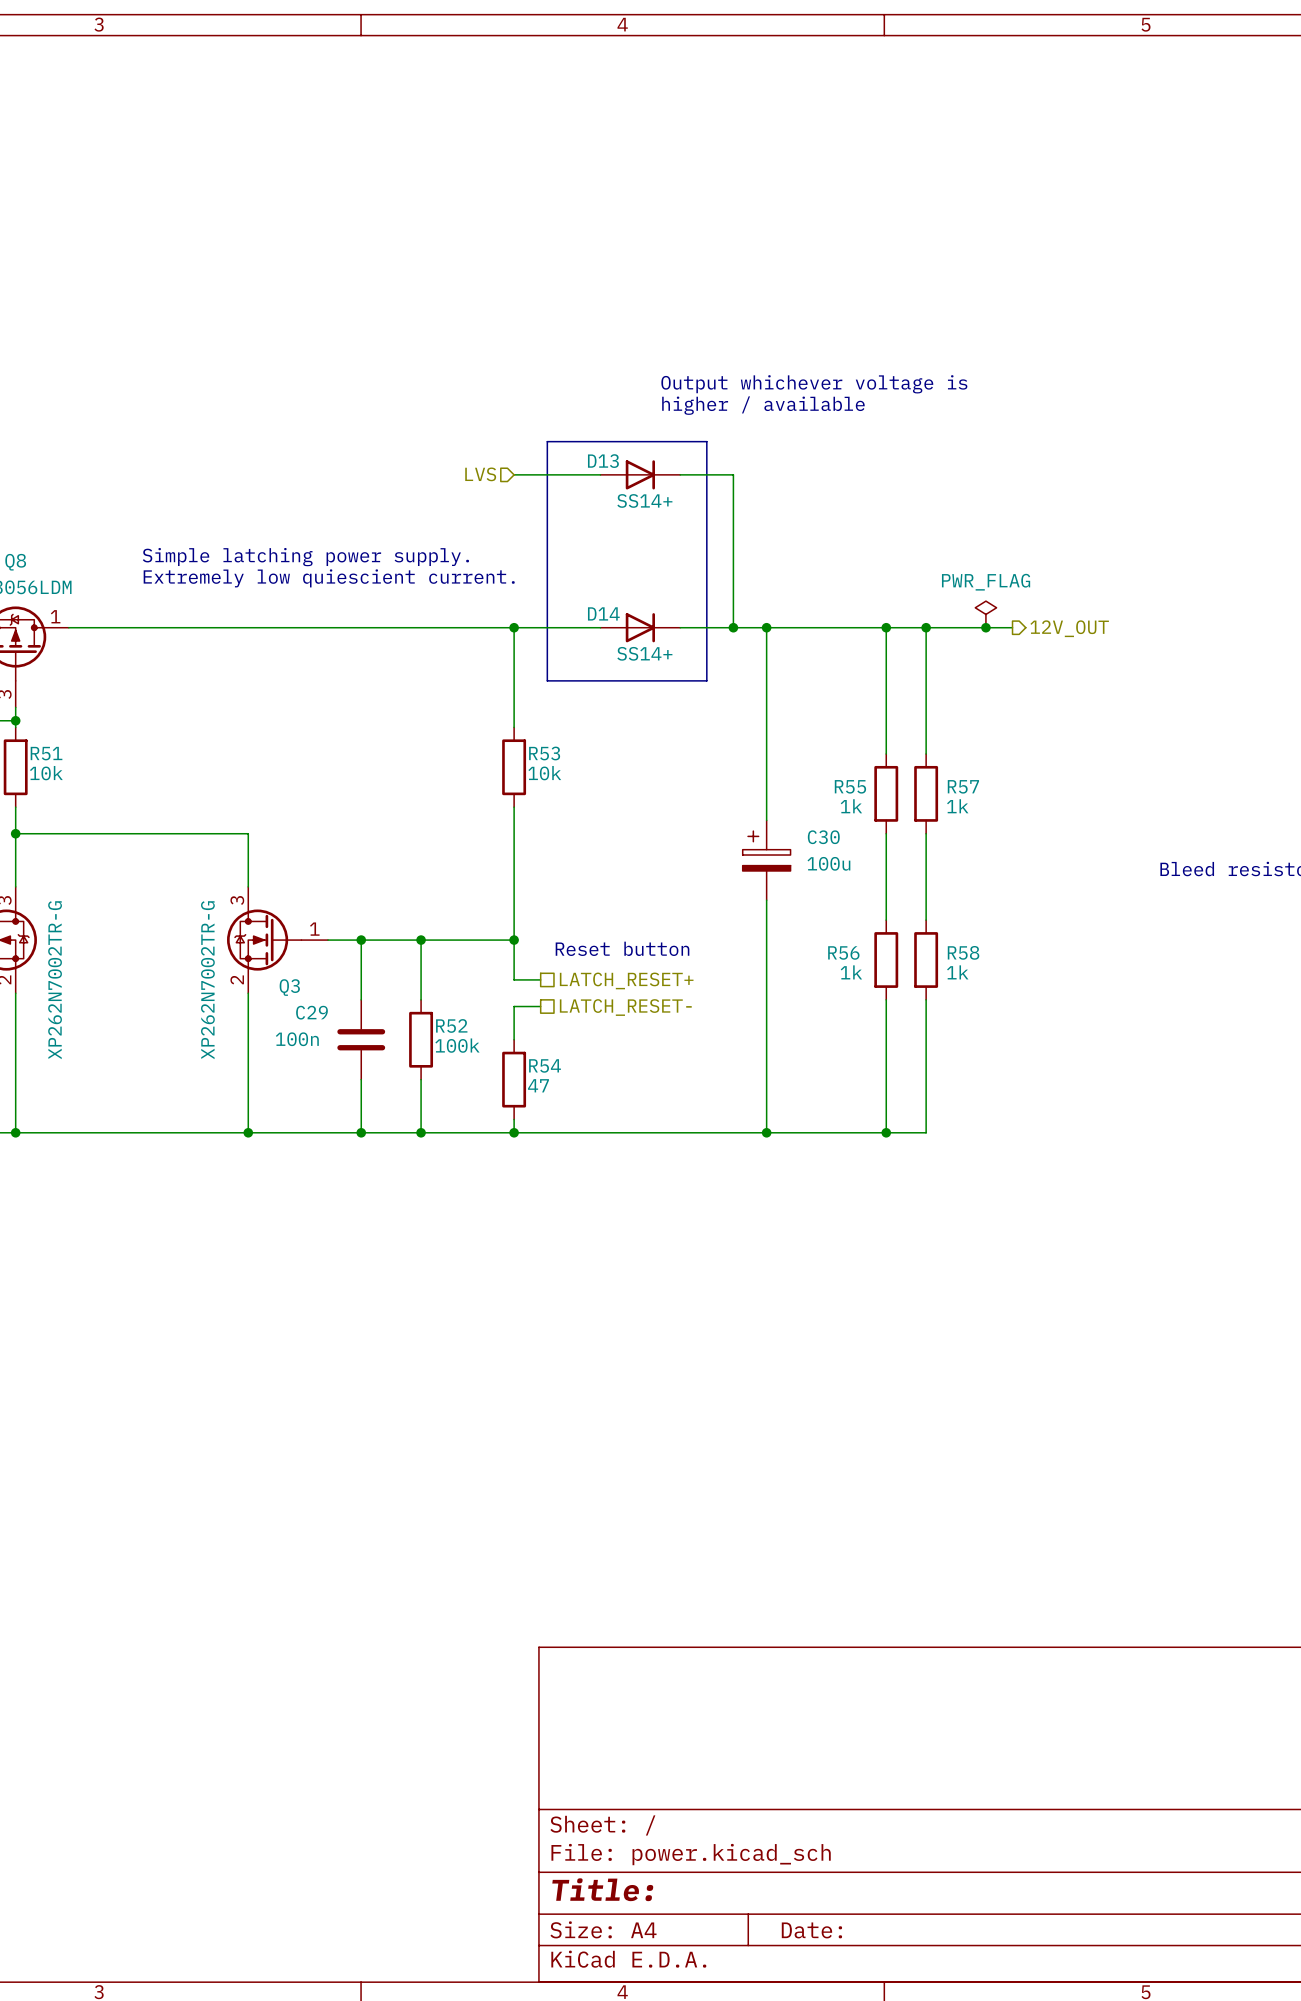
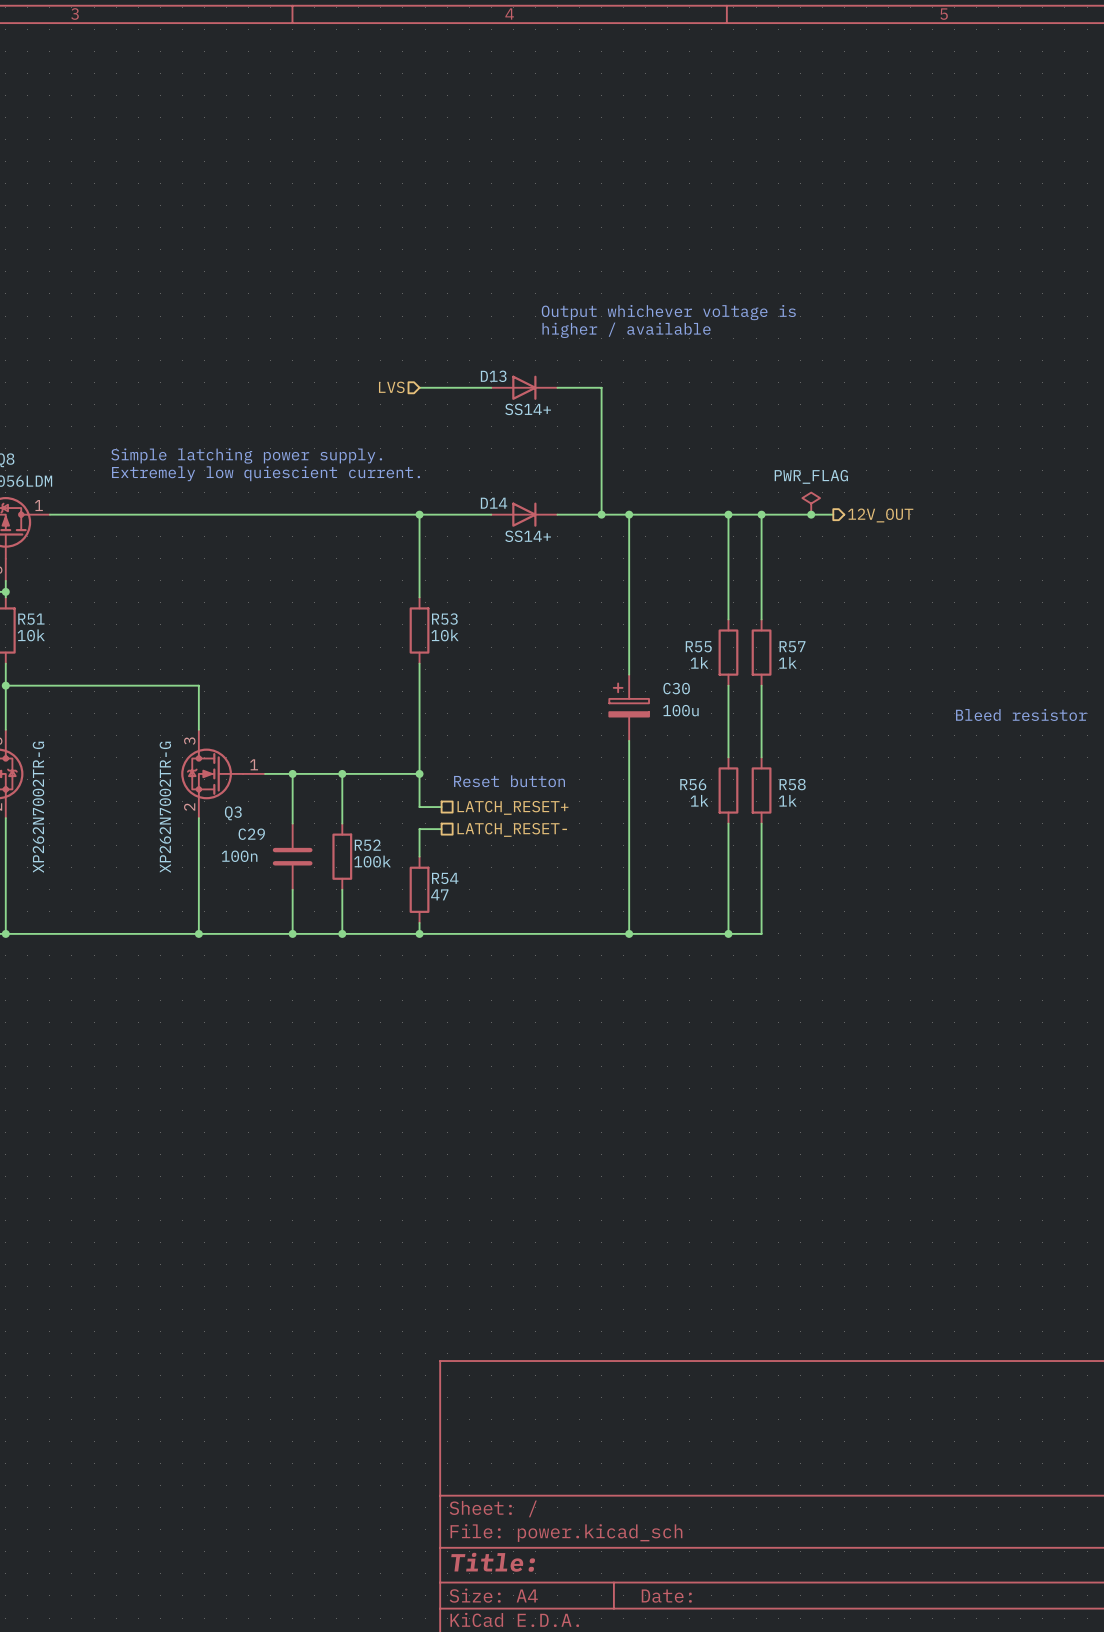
line: (547, 441) (706, 441) (706, 680) (547, 680) (547, 441) -> none

